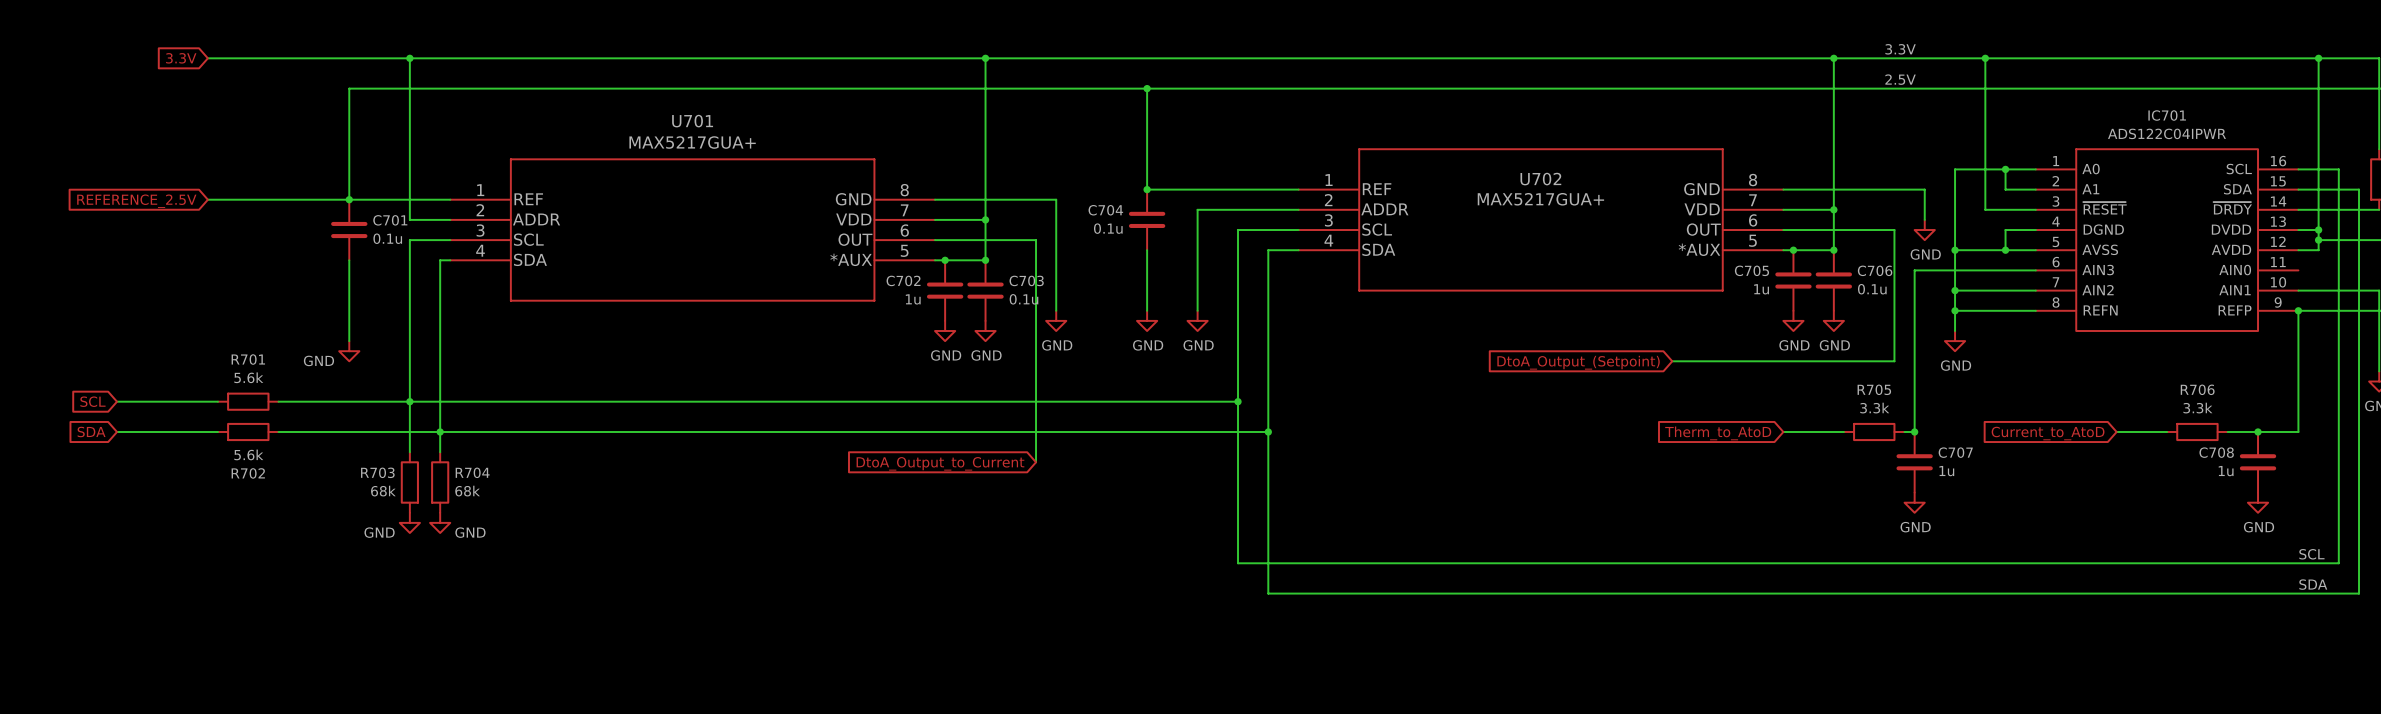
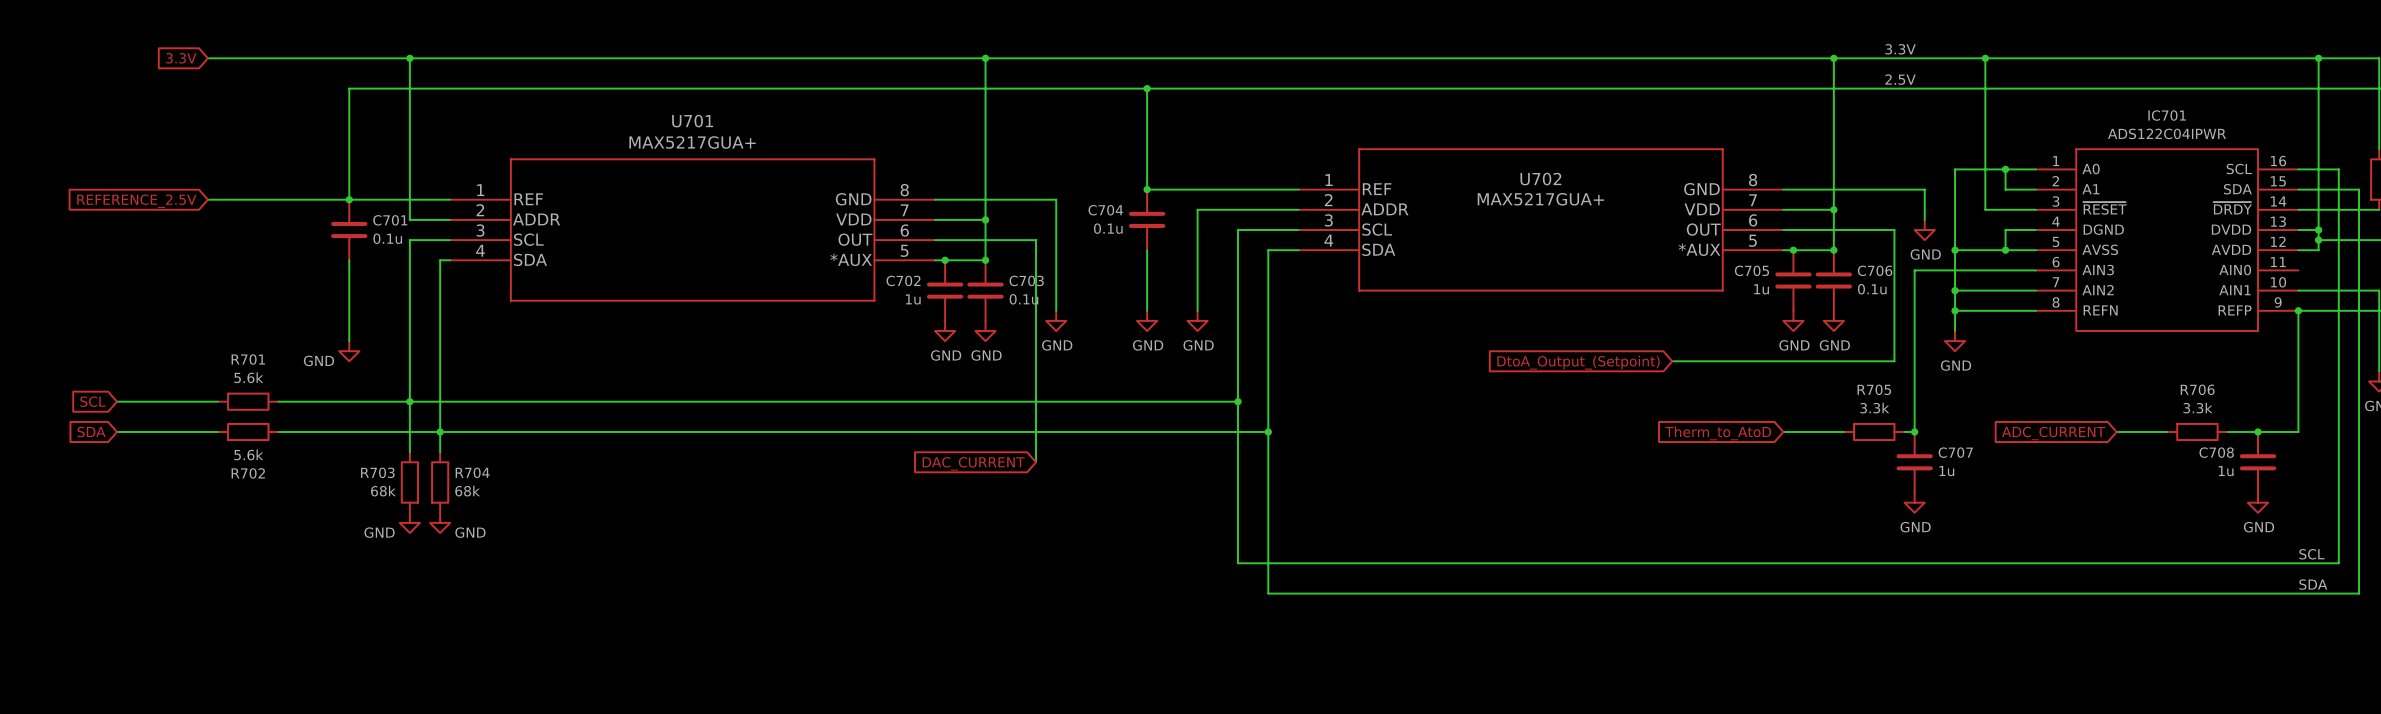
global label: Current_to_AtoD (2048, 433) -> ADC_CURRENT (2053, 433)
global label: DtoA_Output_to_Current (940, 463) -> DAC_CURRENT (973, 463)

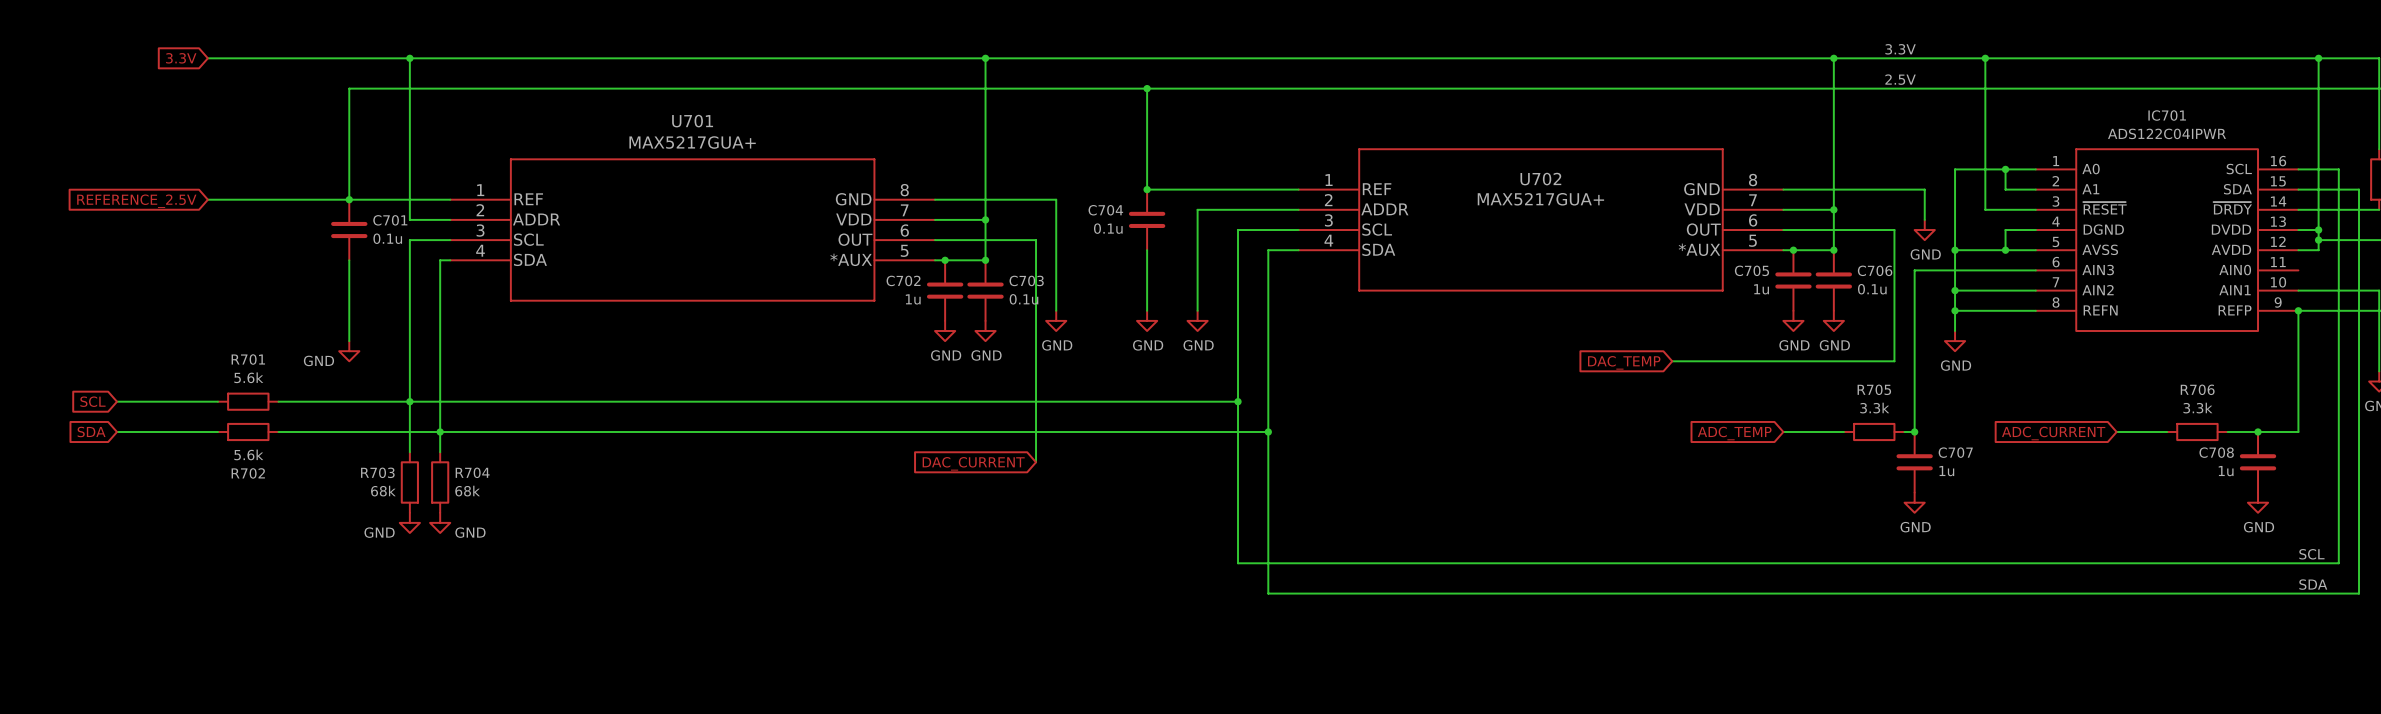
global label: DtoA_Output_(Setpoint) (1578, 362) -> DAC_TEMP (1624, 362)
global label: Therm_to_AtoD (1718, 433) -> ADC_TEMP (1734, 433)

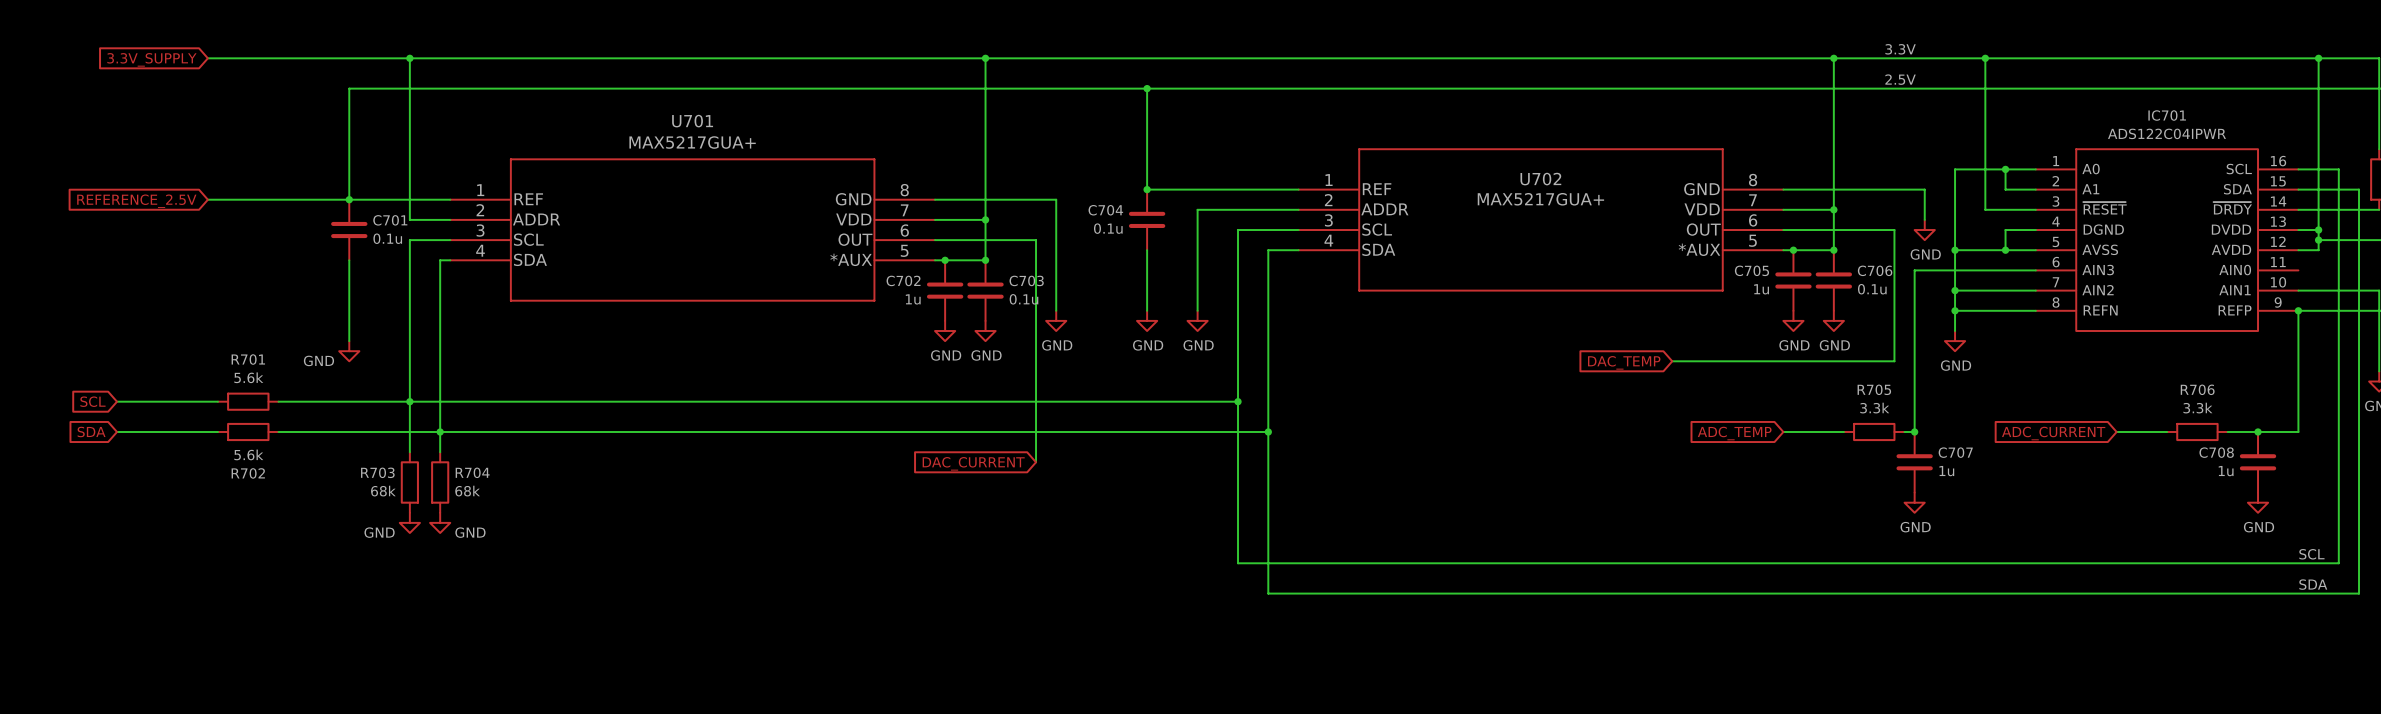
global label: 3.3V (181, 58) -> 3.3V_SUPPLY (151, 59)

